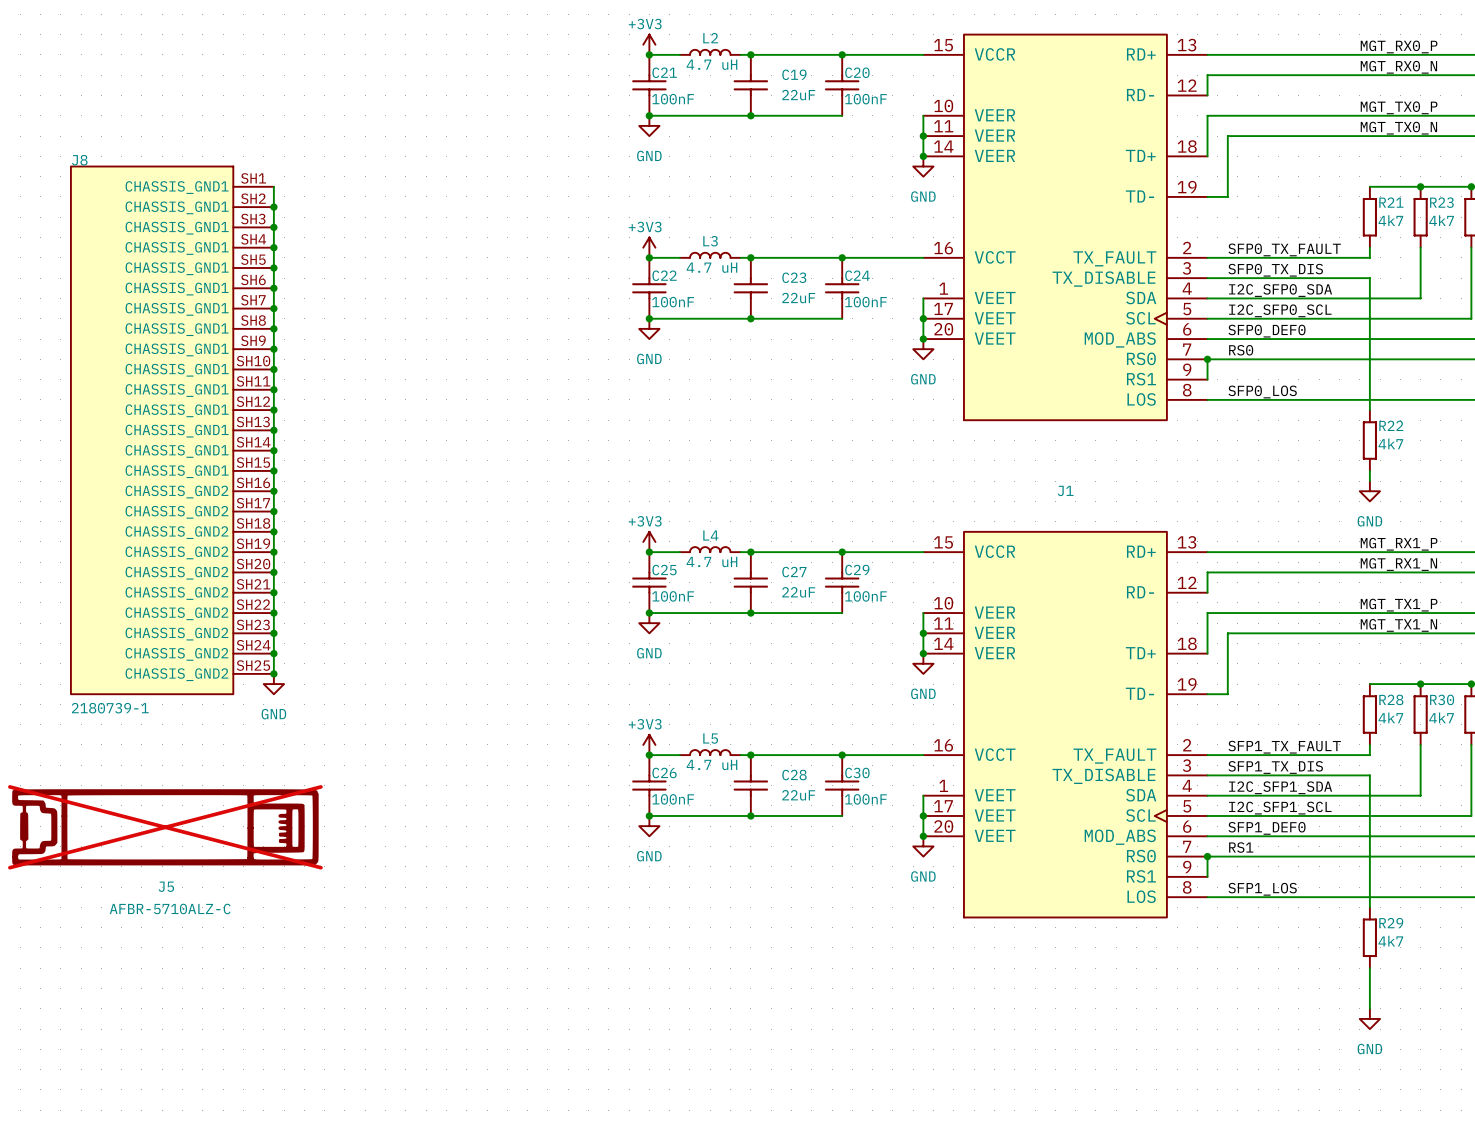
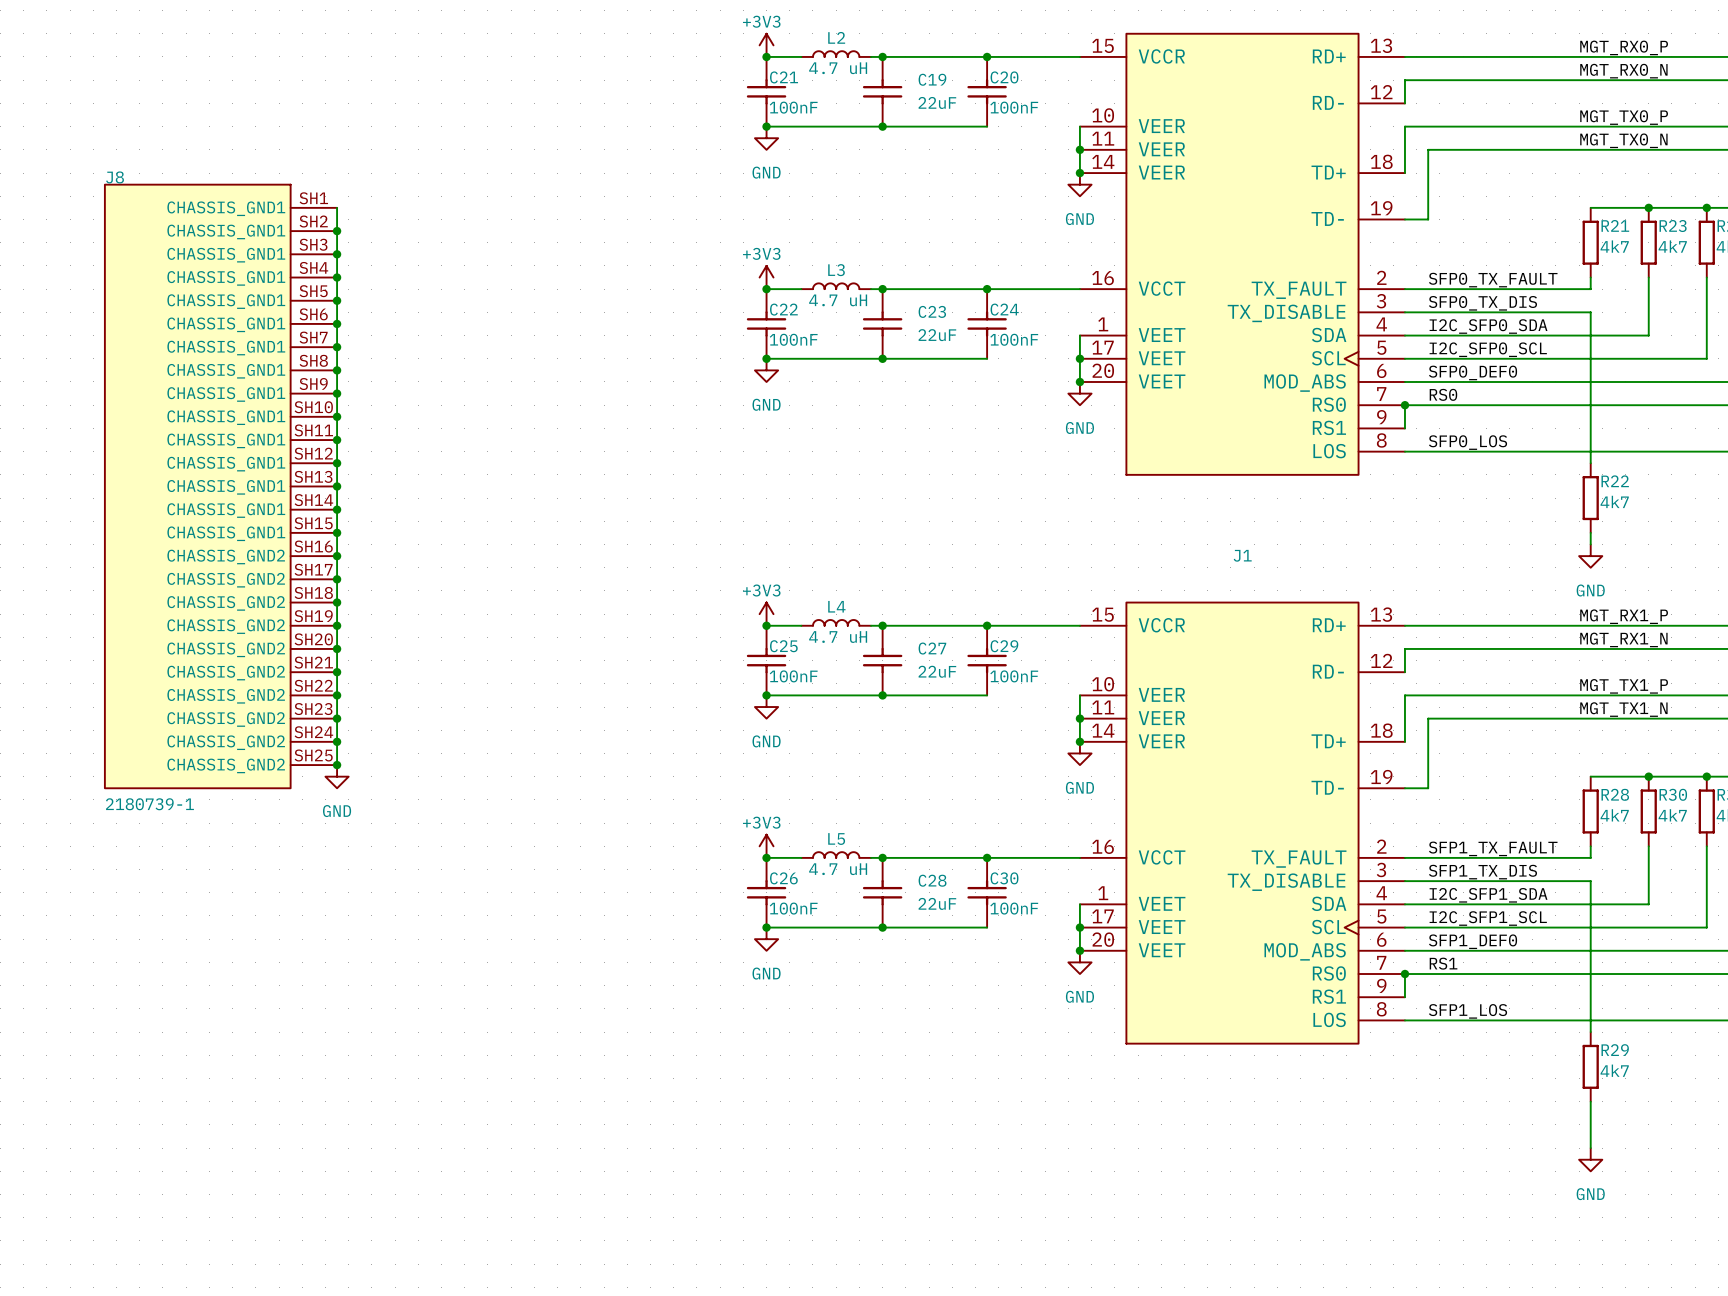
J5: AFBR-5710ALZ-C (165, 827) -> none

